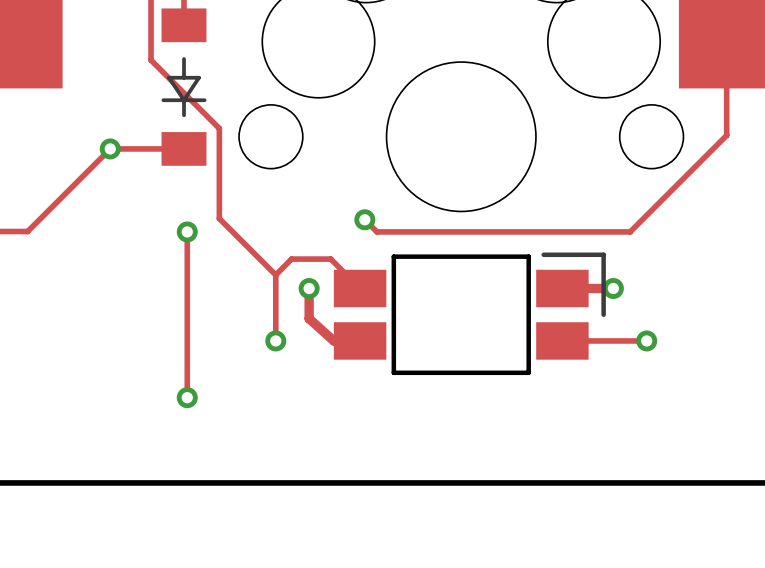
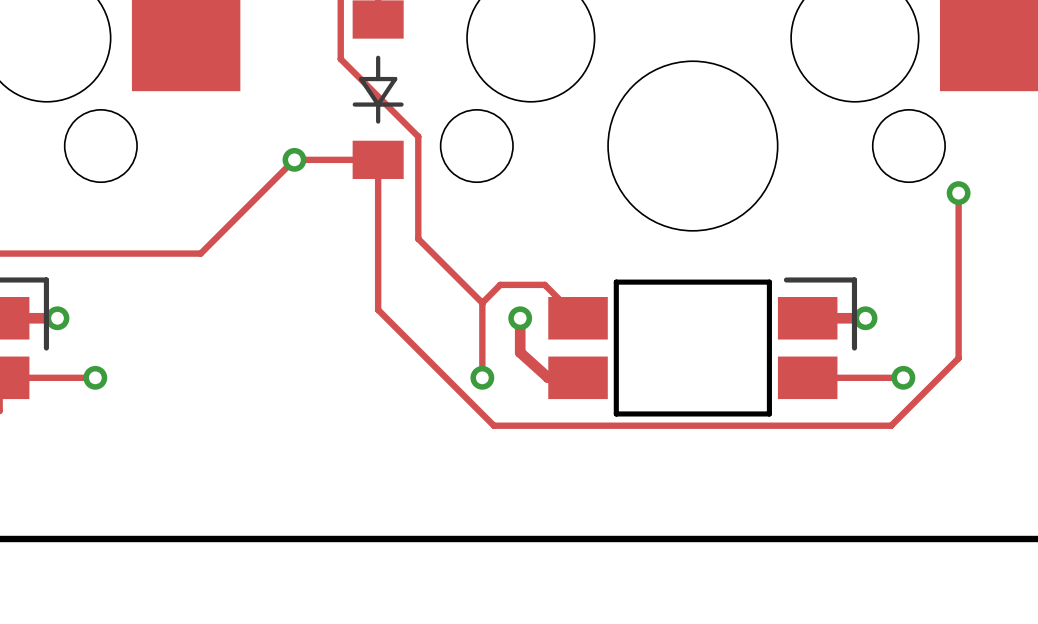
track: (726, 41) (726, 135) (630, 231) (376, 231) (364, 219) -> none
track: none -> (378, 159) (378, 309) (493, 425) (891, 425) (958, 358) (958, 193)
via: none -> (958, 193)
via: (364, 219) -> none
track: (187, 231) (187, 397) -> none
via: (187, 231) -> none
via: (187, 397) -> none

